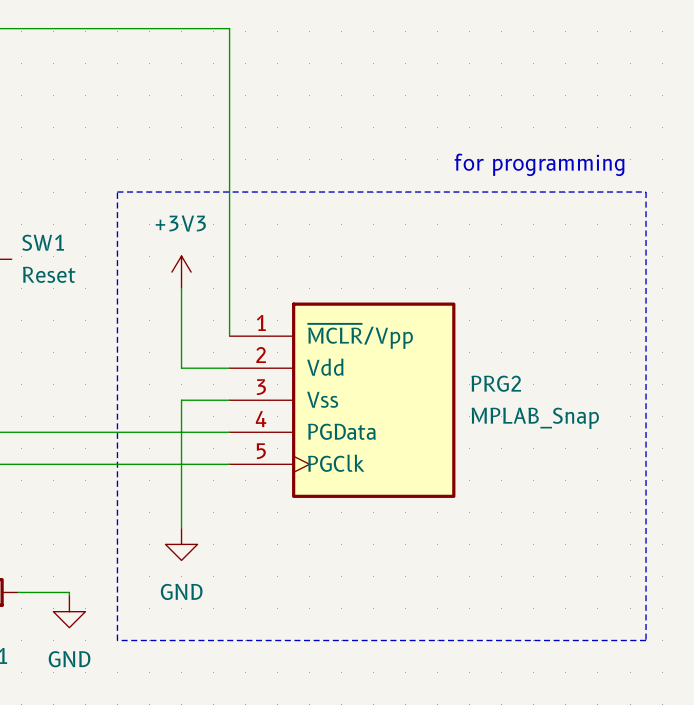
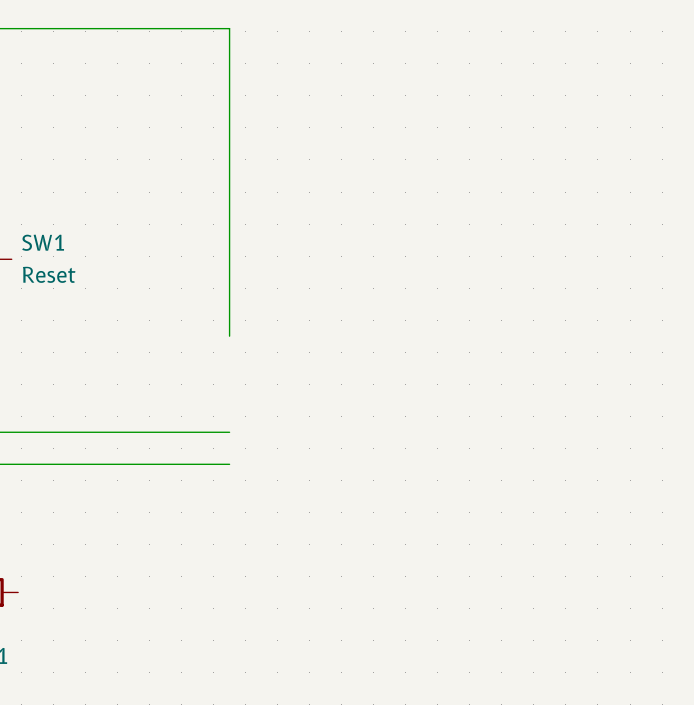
text: for programming (539, 164) -> none
line: (117, 192) (646, 192) (646, 640) (117, 640) (117, 192) -> none
power symbol: +3V3 (181, 272) -> none
wire: (181, 288) (181, 368) (229, 368) -> none
wire: (229, 400) (181, 400) (181, 528) -> none
PRG2: MPLAB_Snap (342, 400) -> none
power symbol: GND (181, 544) -> none
wire: (18, 592) (69, 592) (69, 595) -> none
power symbol: GND (69, 611) -> none

